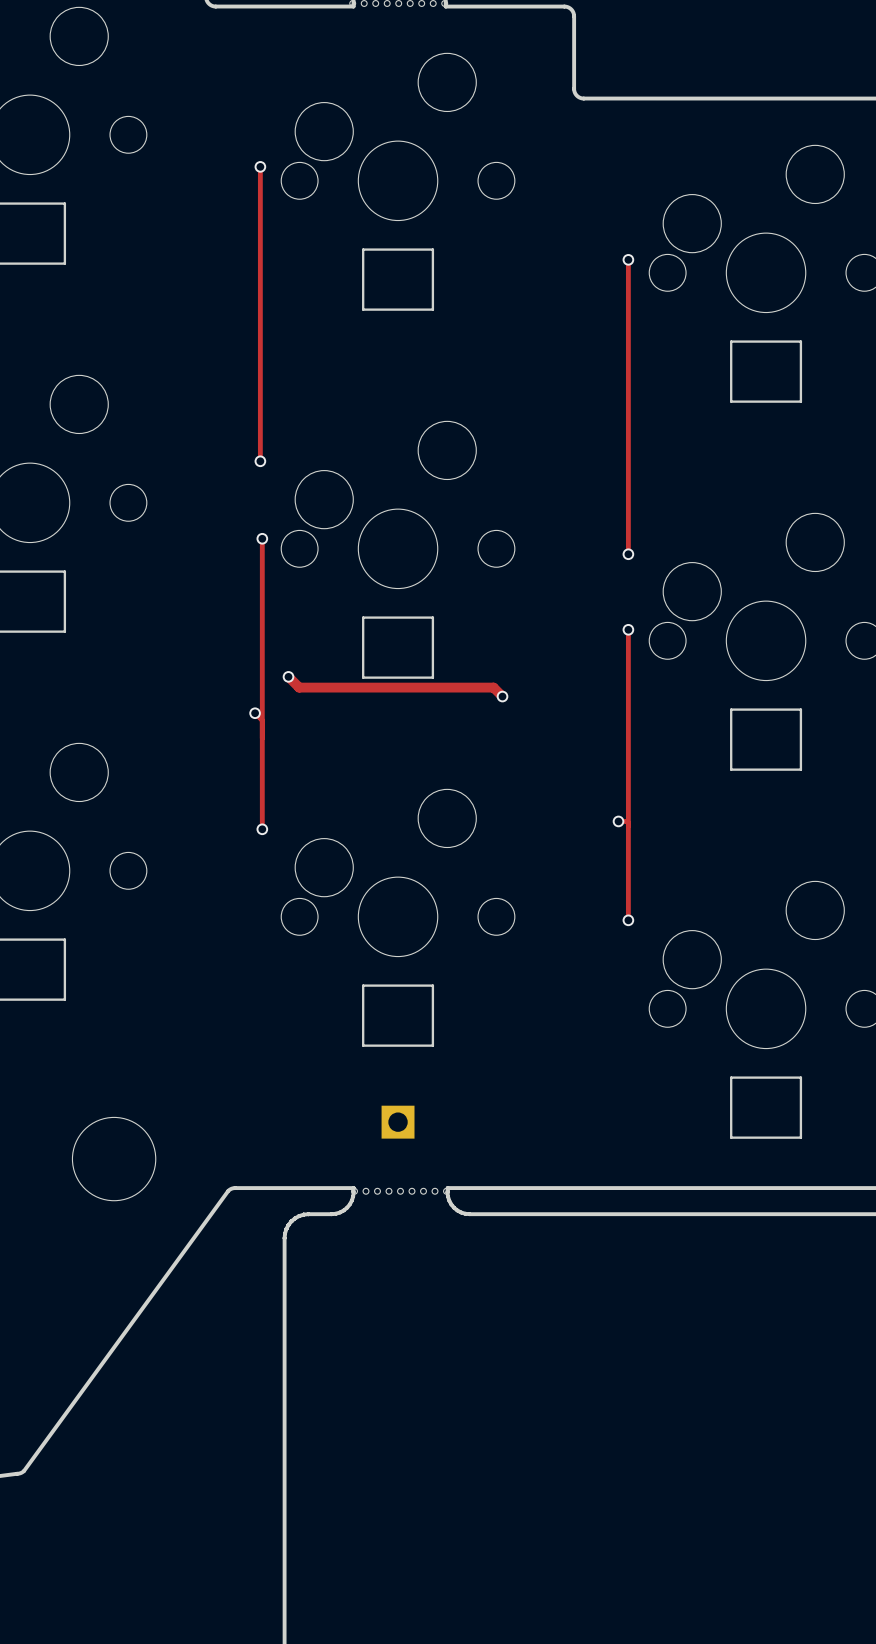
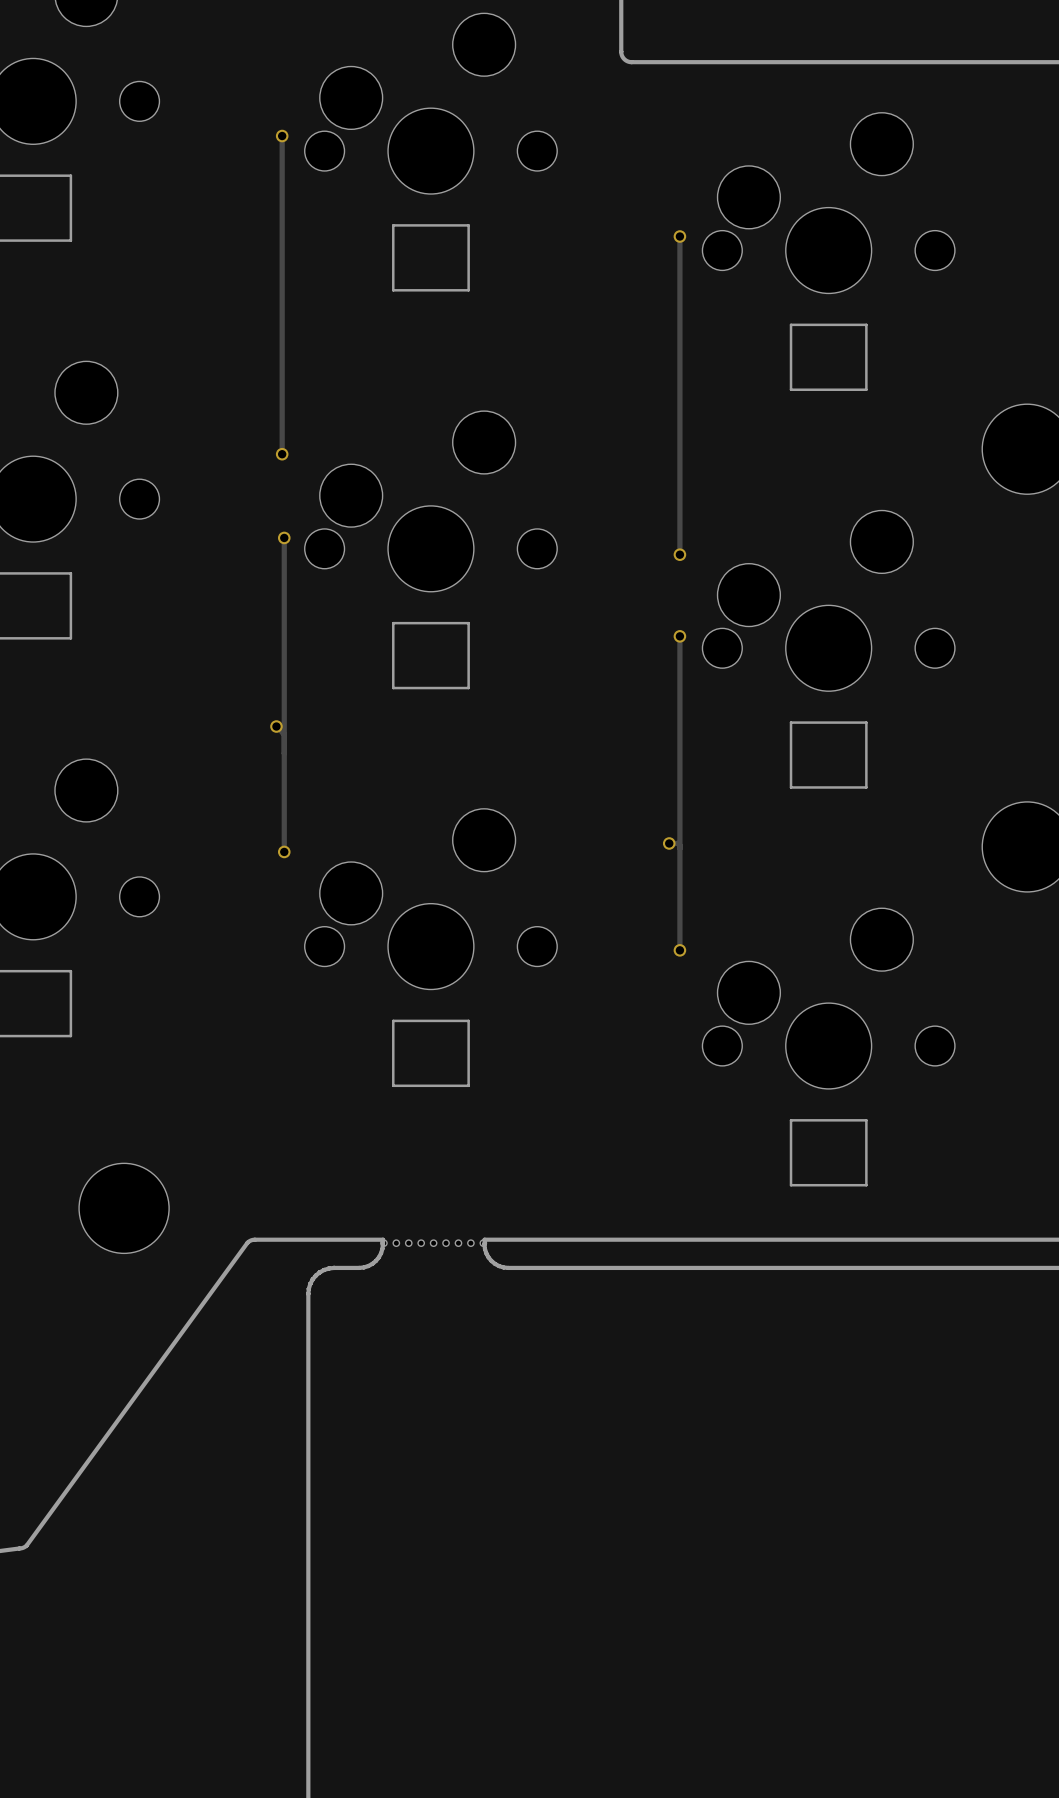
track: (288, 676) (299, 687) (493, 687) (502, 696) -> none
via: (288, 676) -> none
via: (502, 696) -> none
part: (398, 1122) -> none

